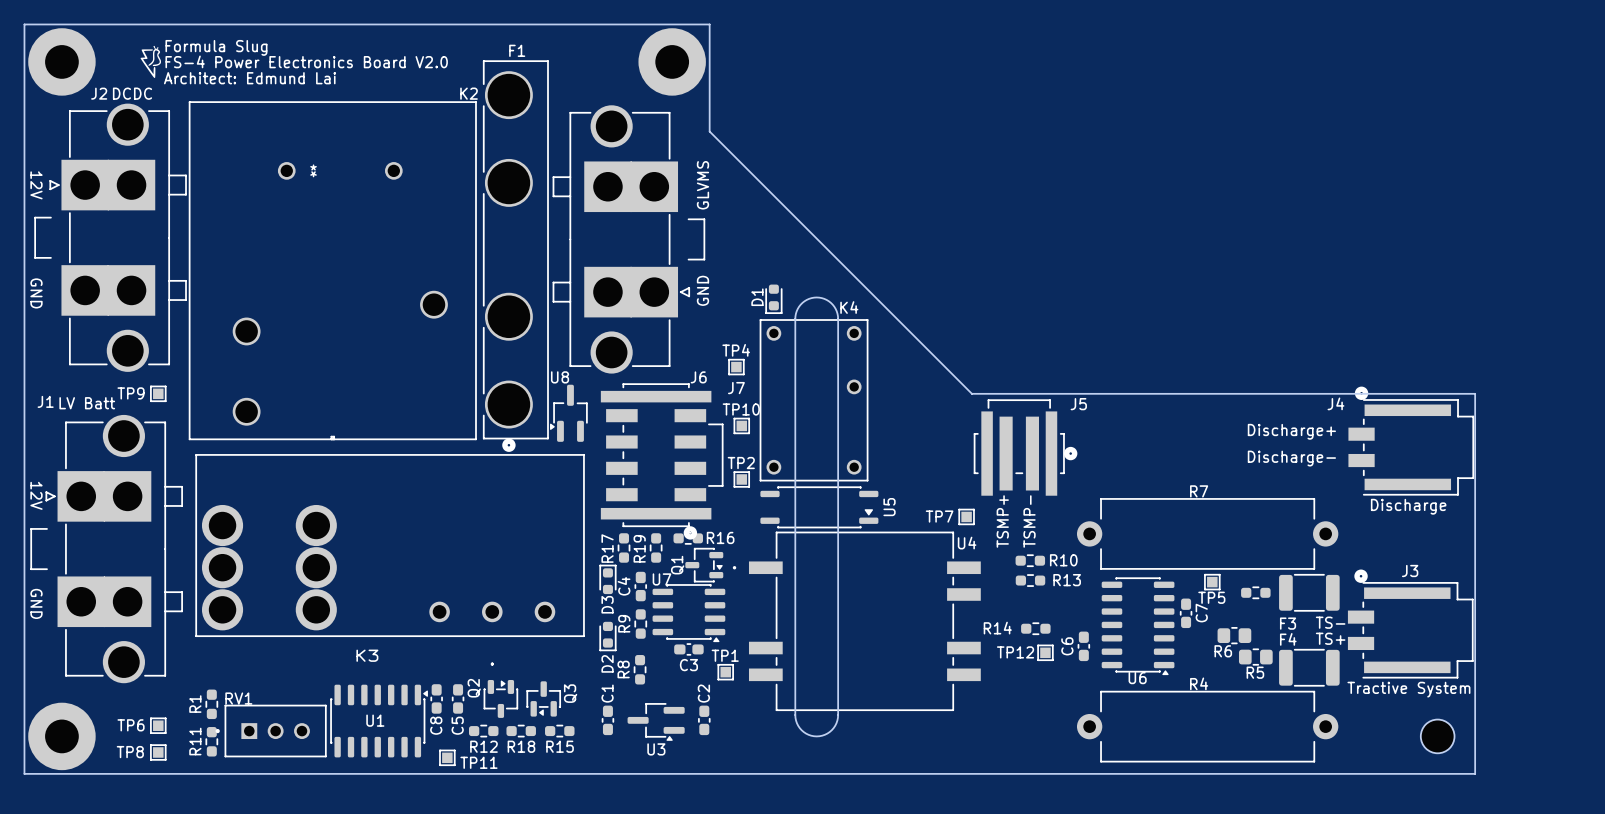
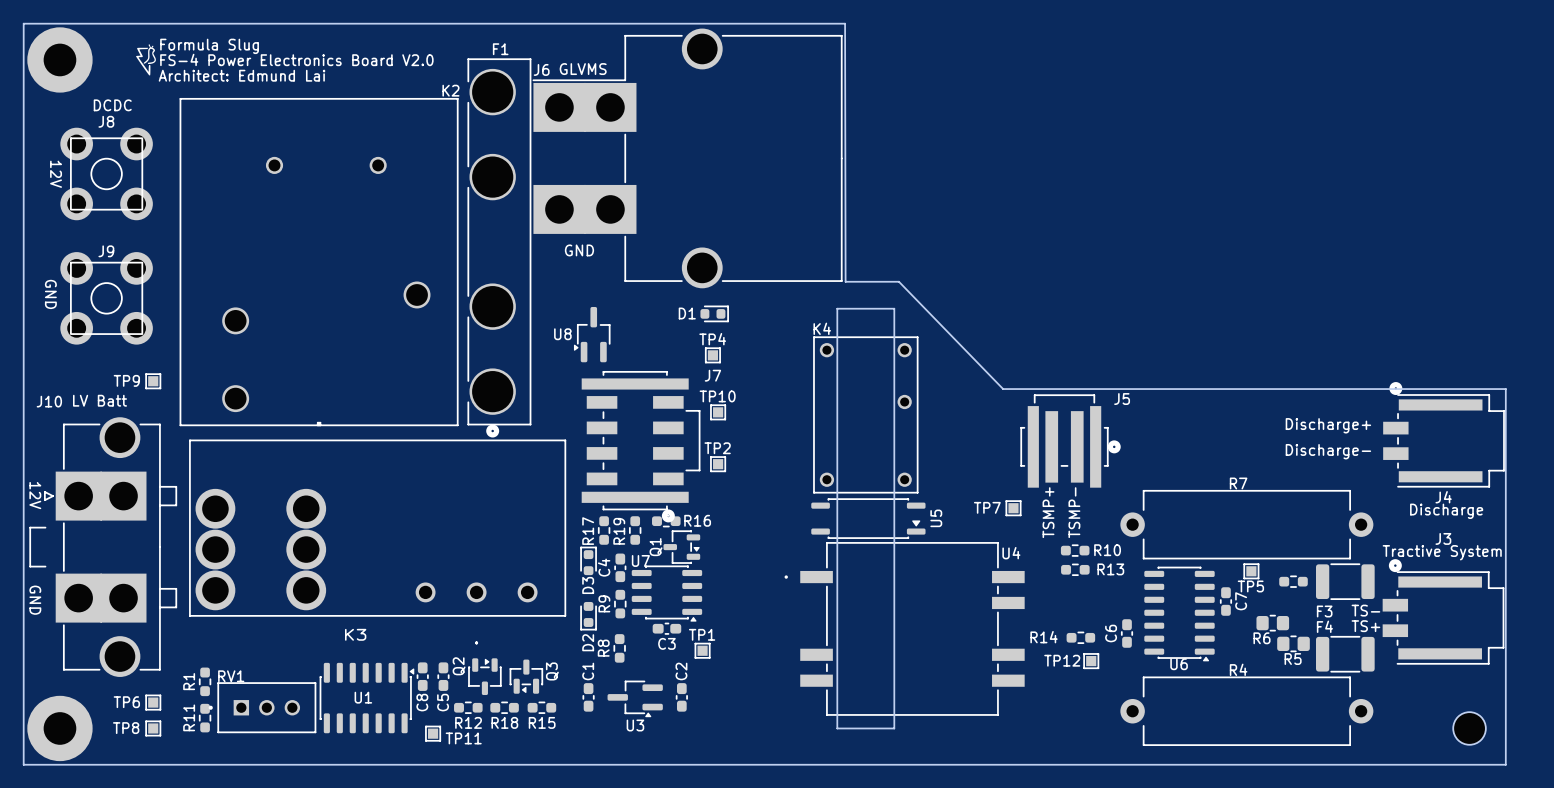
board edge: (709, 24) (709, 131) (971, 393) (1475, 393) (1475, 773) (24, 773) -> (687, 23) (845, 23) (845, 281) (898, 281) (1003, 389) (1505, 389) (1505, 764) (23, 764) (23, 749)
part: (672, 61) -> none
text position: DCDC (132, 93) -> DCDC (112, 105)
K2 footprint: [188, 101, 477, 441] -> [179, 98, 459, 427]
J6 footprint: [552, 105, 706, 374] -> [532, 28, 843, 289]
J8: none -> (106, 173)
text position: 12V (36, 185) -> 12V (56, 174)
text rotation: 0° (702, 185) -> 90° clockwise (583, 69)
text position: GLVMS (702, 185) -> GLVMS (583, 69)
J2: (110, 237) -> none
text rotation: 0° (702, 290) -> 90° clockwise (579, 250)
text position: GND (702, 290) -> GND (579, 250)
text position: GND (36, 293) -> GND (50, 294)
D1 rotation: 0° (773, 299) -> 90° counterclockwise (714, 313)
D1 position: (773, 299) -> (714, 313)
K4 name position: K4 (849, 307) -> K4 (822, 328)
J9: none -> (106, 298)
board edge: (795, 318) (795, 715) (796, 723) (801, 730) (808, 734) (816, 736) (824, 734) (831, 730) (836, 723) (838, 715) (838, 318) (832, 304) (824, 298) (816, 297) (809, 298) (800, 304) (795, 318) -> none
board edge: none -> (837, 308) (837, 728) (894, 728) (894, 308) (837, 308)
U8 name position: U8 (560, 377) -> U8 (562, 334)
J6 name position: J6 (698, 377) -> J6 (541, 69)
K4 position: (814, 400) -> (865, 414)
text position: LV Batt (87, 403) -> LV Batt (100, 400)
J4 name position: J4 (1335, 403) -> J4 (1443, 497)
U8 position: (568, 413) -> (592, 334)
text position: Discharge+ (1291, 431) -> Discharge+ (1328, 425)
J4 position: (1411, 441) -> (1443, 434)
J5 position: (1025, 447) -> (1070, 441)
text position: Discharge- (1291, 458) -> Discharge- (1328, 451)
text position: 12V (36, 495) -> 12V (35, 495)
text position: Discharge (1408, 506) -> Discharge (1446, 511)
U5 position: (819, 507) -> (868, 518)
TP7 position: (966, 516) -> (1013, 508)
text position: TSMP+ (1002, 521) -> TSMP+ (1048, 512)
text position: TSMP- (1029, 521) -> TSMP- (1074, 512)
R7 position: (1207, 533) -> (1246, 524)
J1: (106, 549) -> none
R10 position: (1030, 560) -> (1075, 550)
J10: none -> (103, 547)
J3 name position: J3 (1410, 571) -> J3 (1443, 538)
R13 position: (1030, 580) -> (1075, 569)
TP5 position: (1212, 582) -> (1251, 571)
part position: (1255, 592) -> (1293, 581)
F3 position: (1309, 592) -> (1345, 581)
text position: GND (36, 603) -> GND (35, 600)
C7 position: (1186, 613) -> (1225, 601)
U4 position: (856, 621) -> (904, 628)
text position: TS- (1330, 622) -> TS- (1365, 610)
J3 position: (1410, 623) -> (1443, 611)
U6 position: (1138, 626) -> (1179, 614)
R14 position: (1035, 628) -> (1080, 637)
R6 position: (1234, 635) -> (1272, 623)
text position: TS+ (1330, 638) -> TS+ (1365, 626)
C6 position: (1083, 646) -> (1127, 633)
TP12 position: (1045, 652) -> (1091, 661)
R5 position: (1255, 657) -> (1293, 643)
F4 position: (1309, 667) -> (1345, 654)
text position: Tractive System (1408, 689) -> Tractive System (1442, 552)
R4 position: (1207, 726) -> (1246, 711)
part position: (61, 736) -> (59, 728)
part position: (1437, 736) -> (1469, 728)

